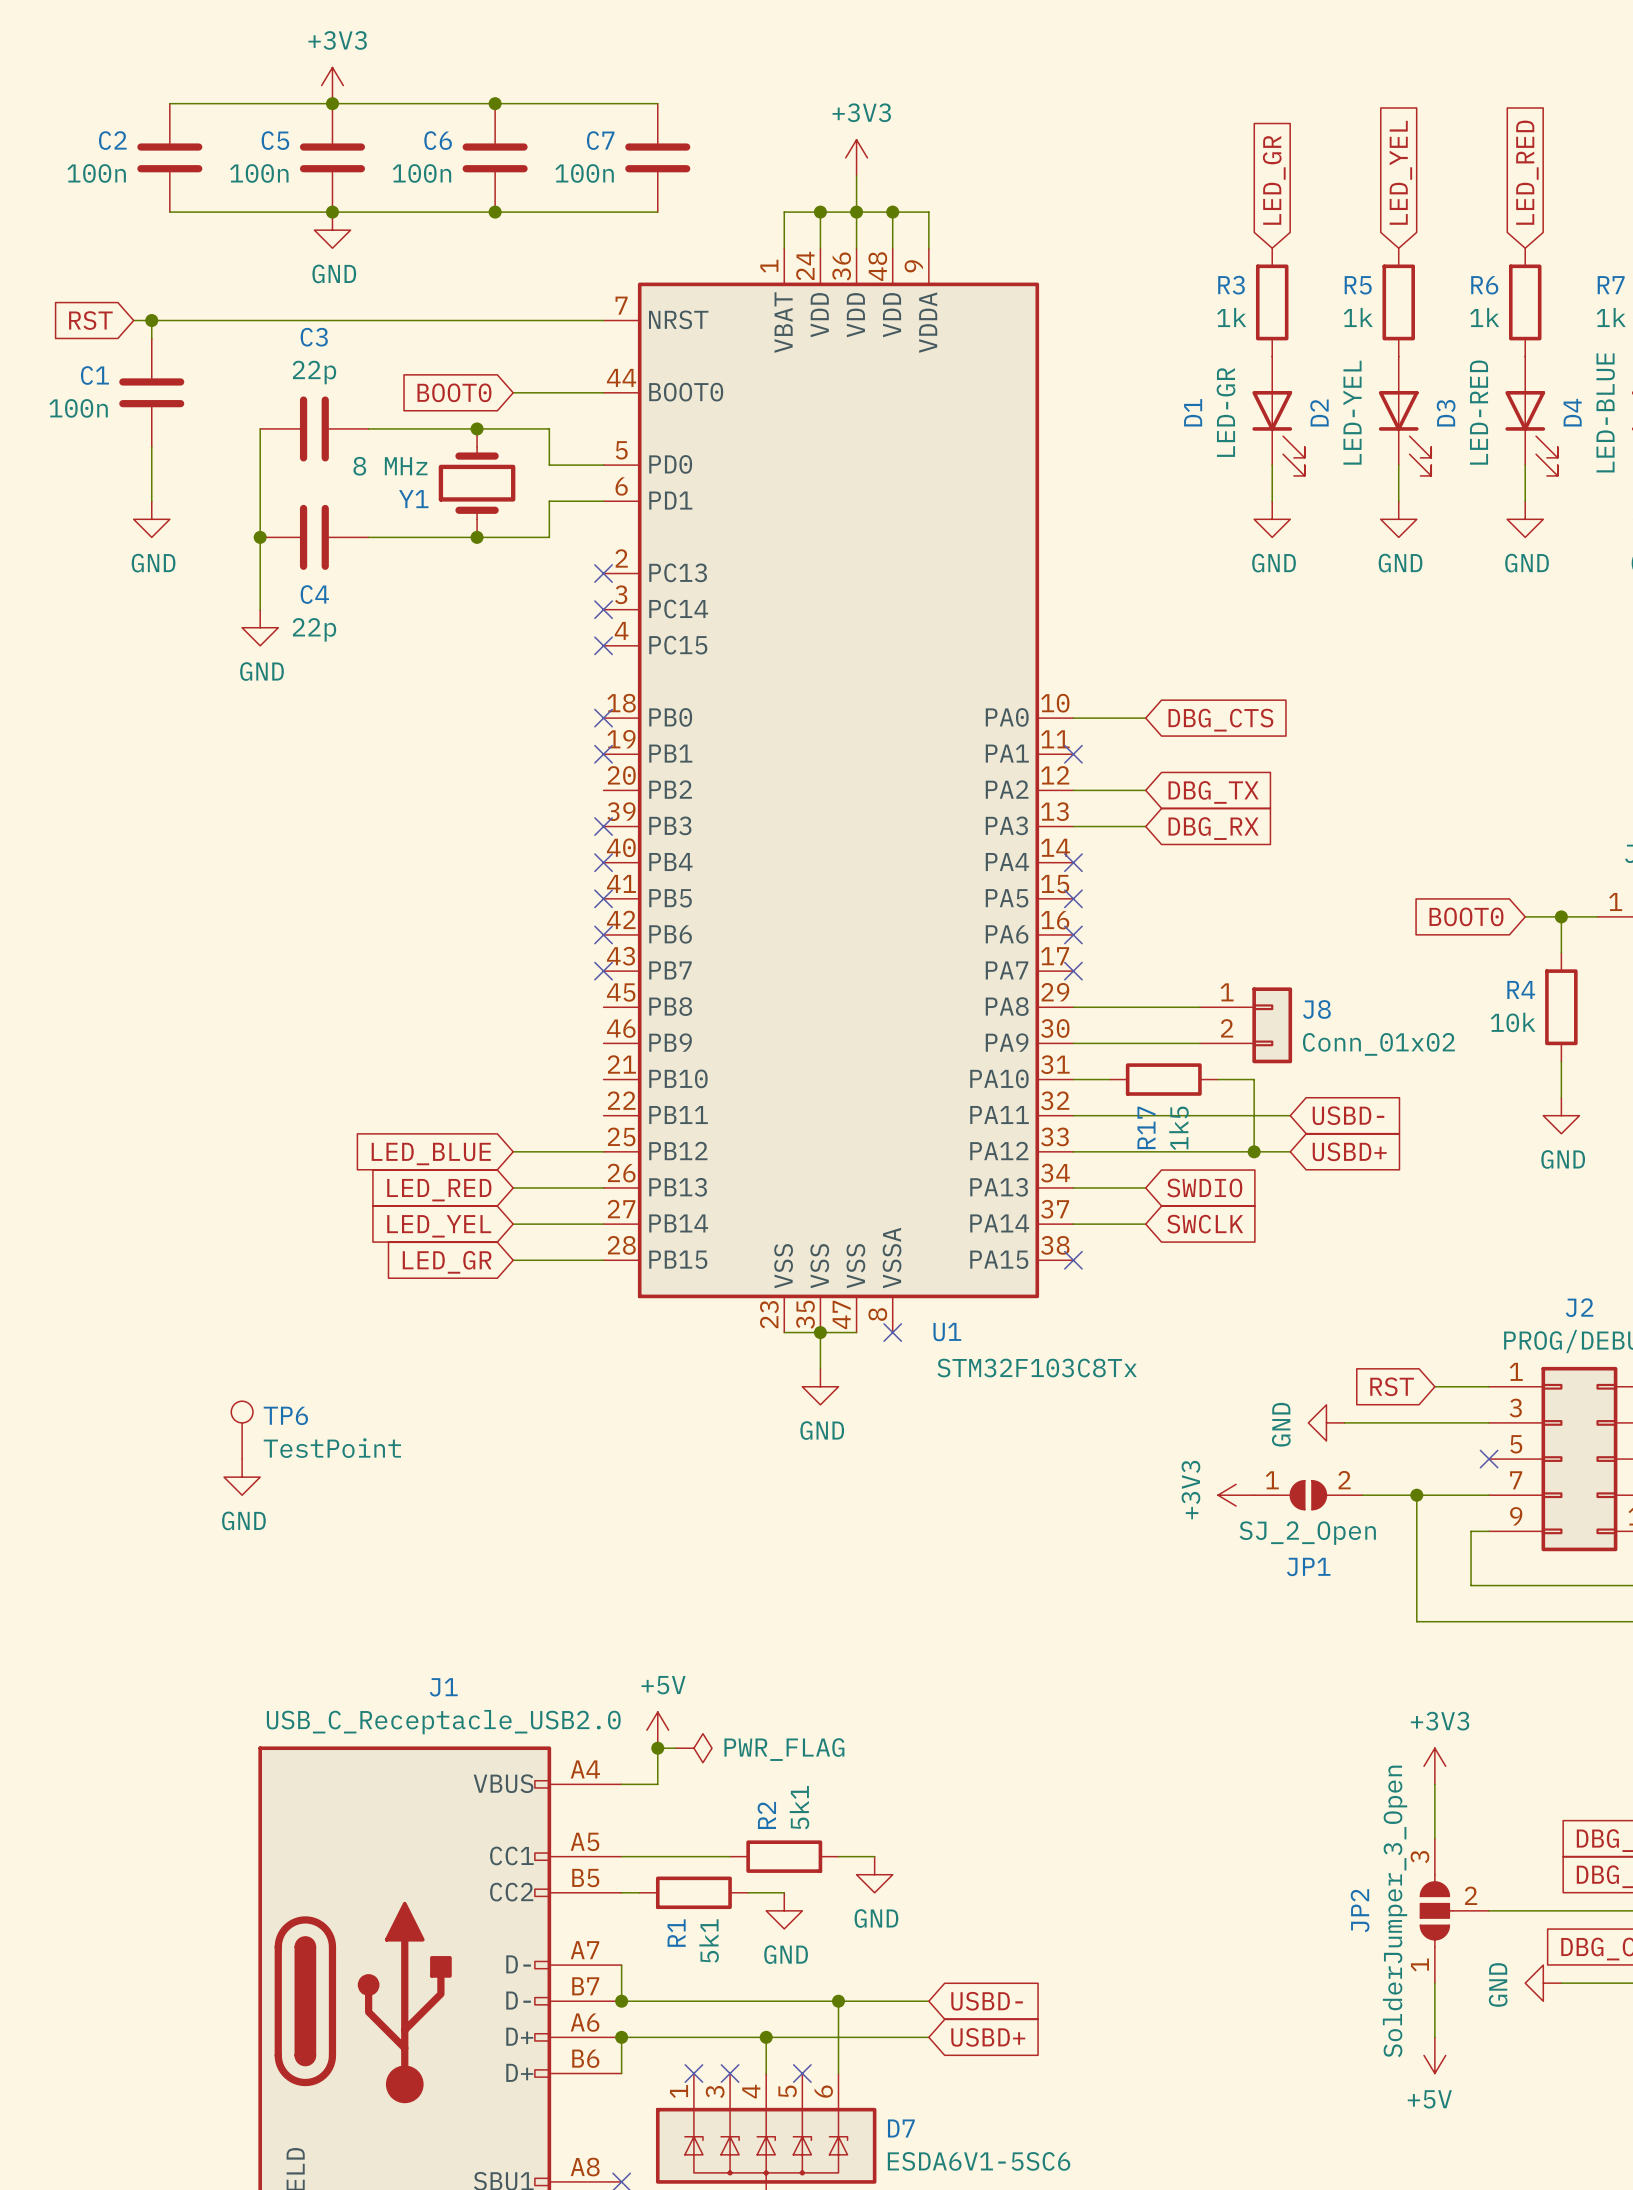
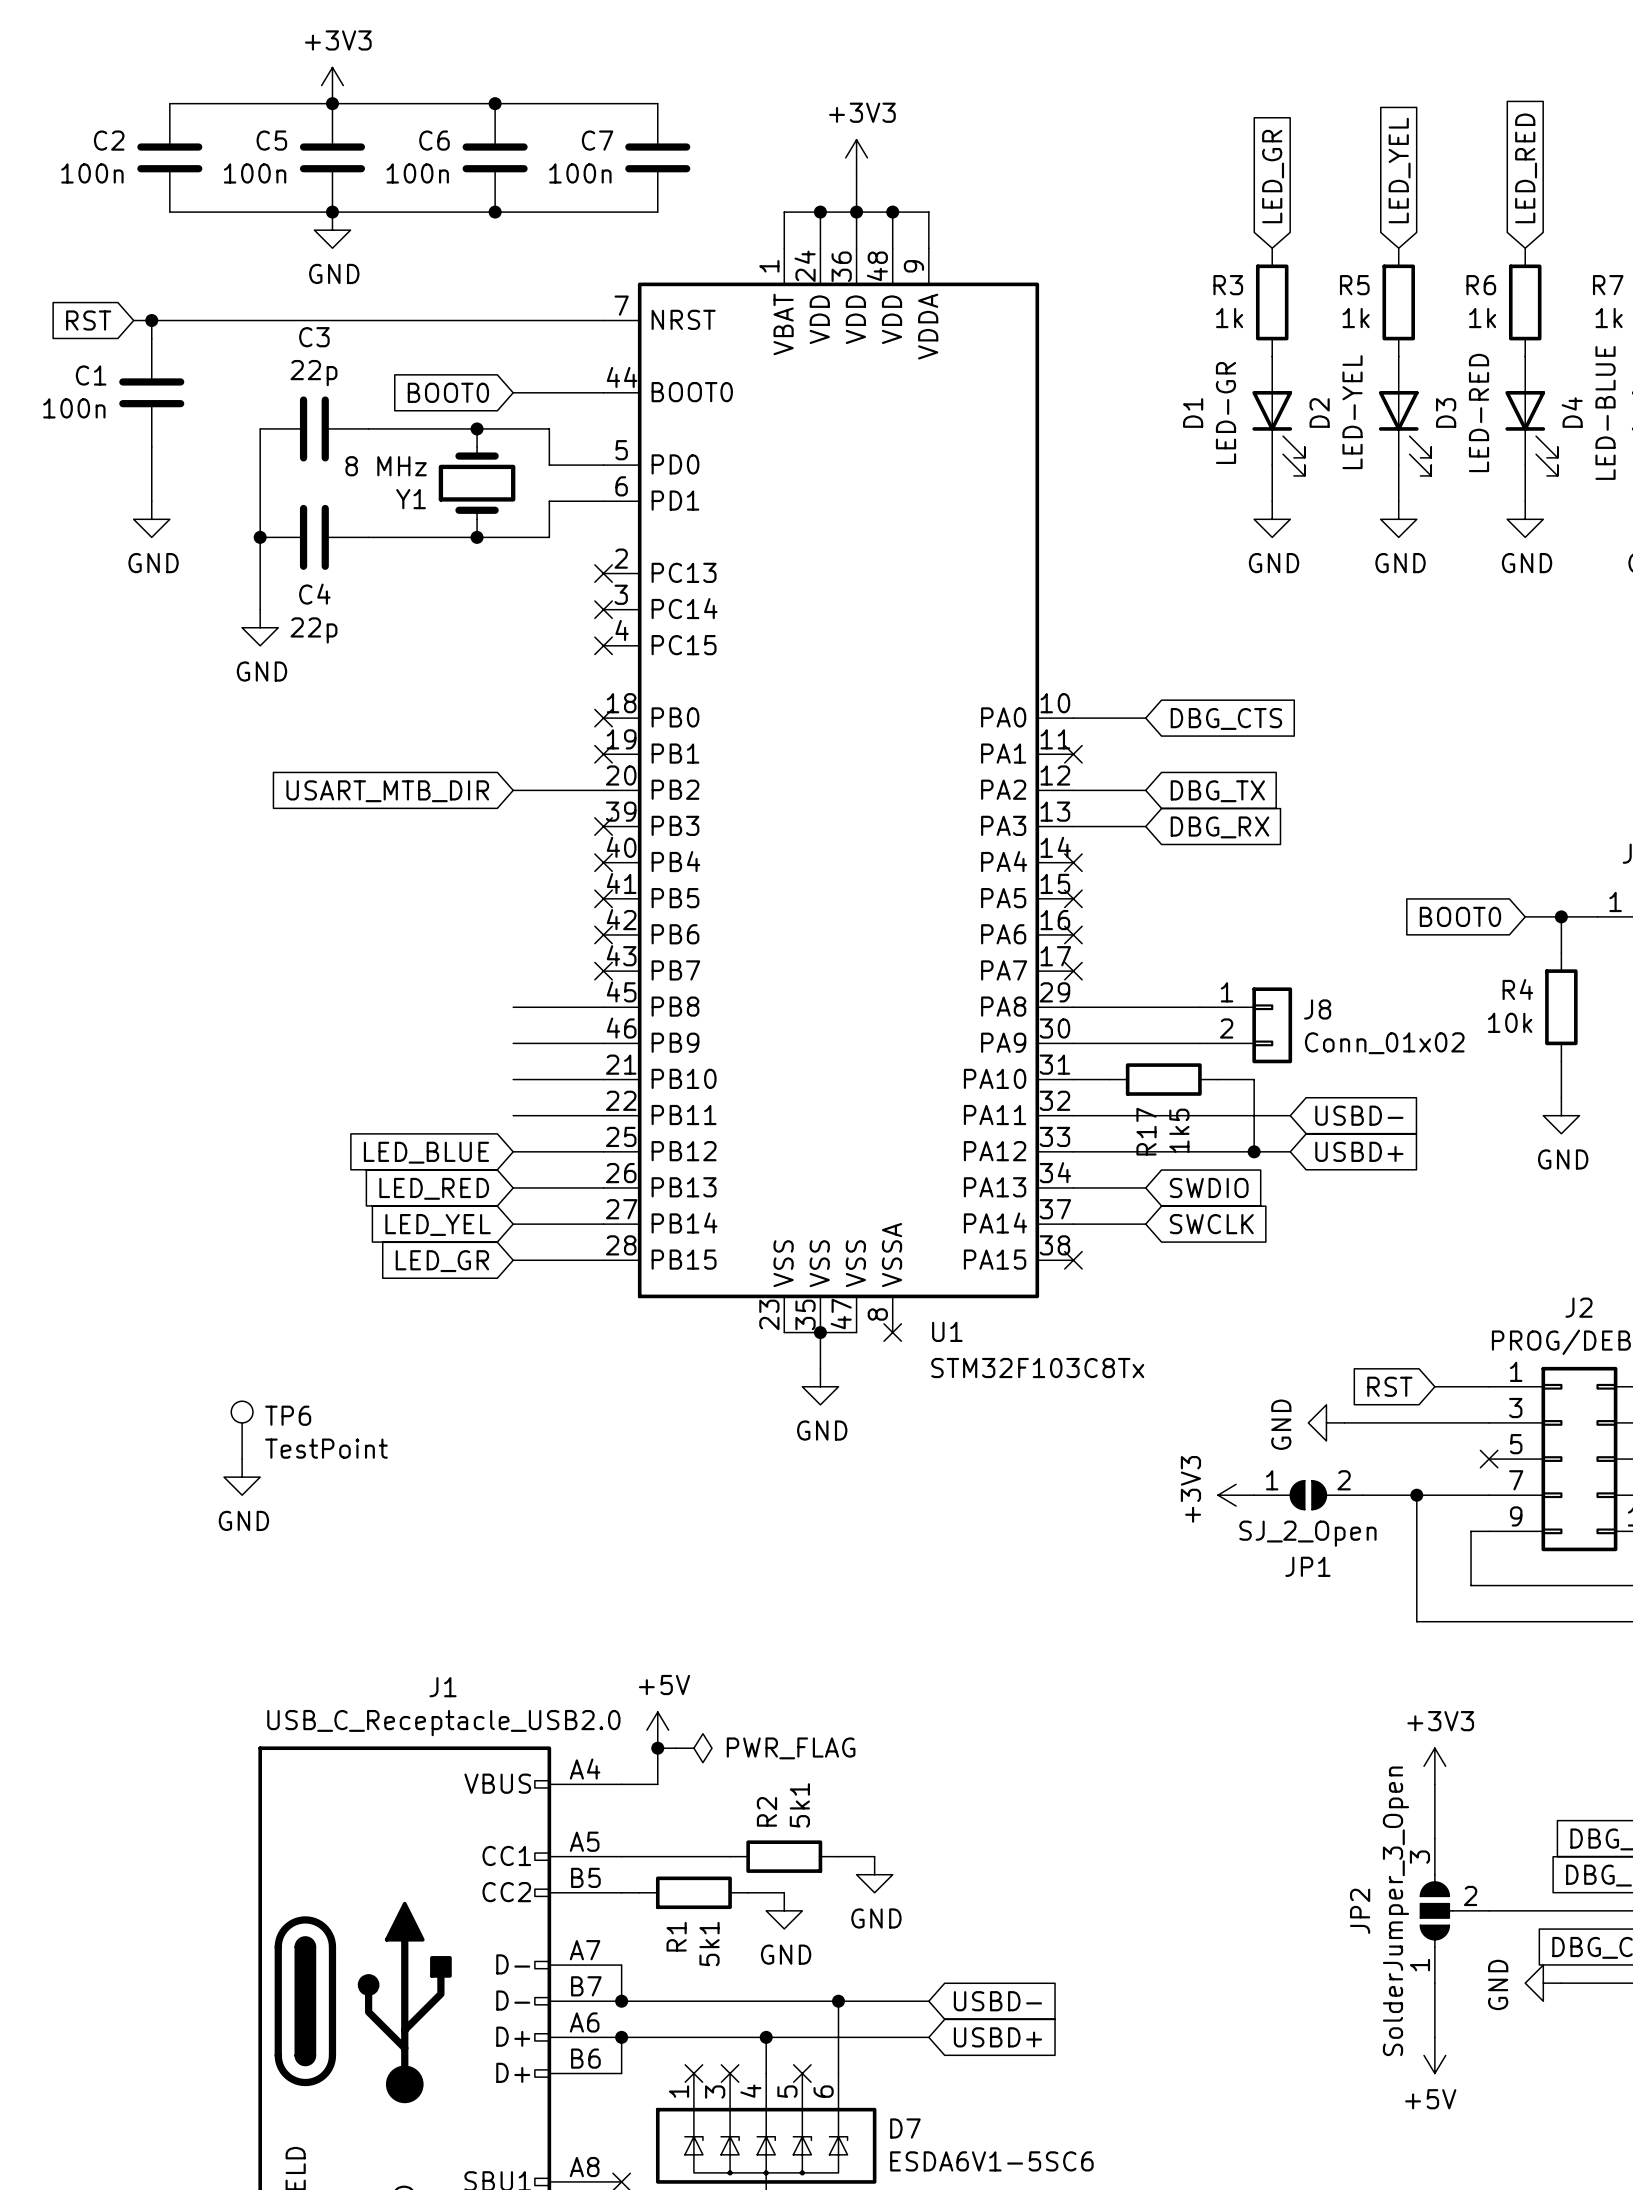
wire: none -> (513, 790) (603, 790)
global label: none -> USART_MTB_DIR (387, 791)
wire: none -> (513, 1007) (603, 1007)
wire: none -> (513, 1043) (603, 1043)
wire: none -> (513, 1079) (603, 1079)
wire: none -> (513, 1115) (603, 1115)

